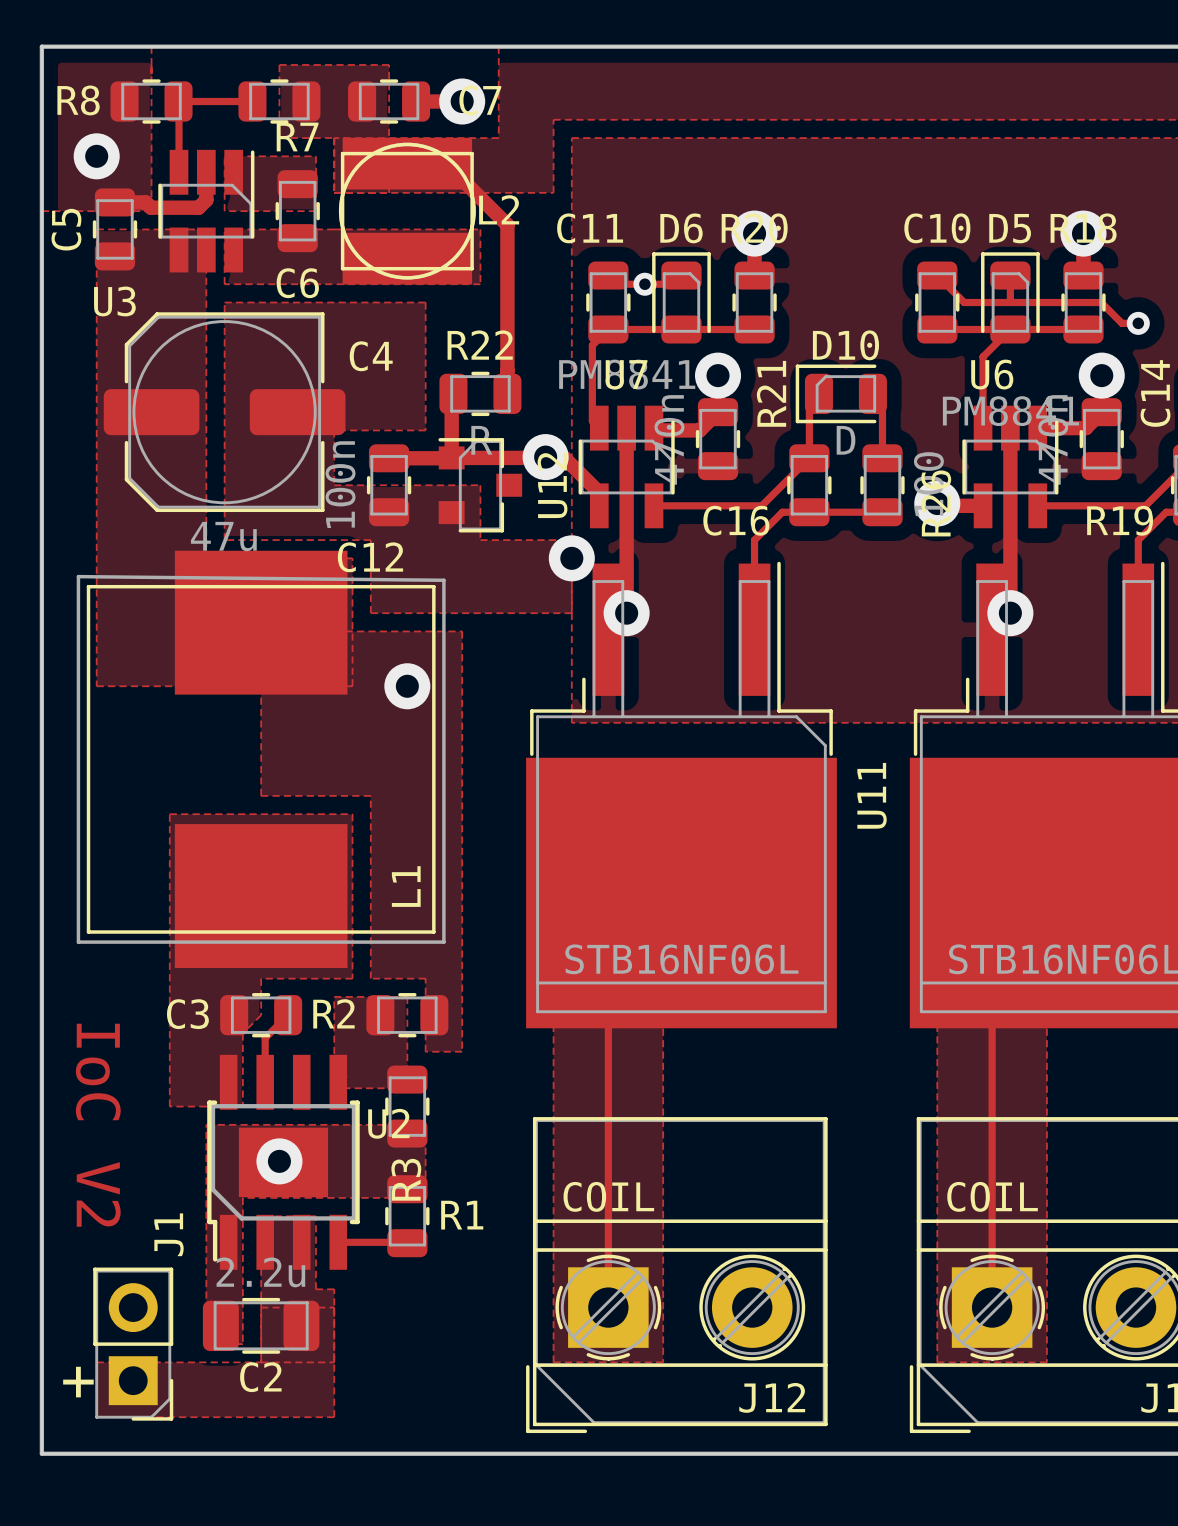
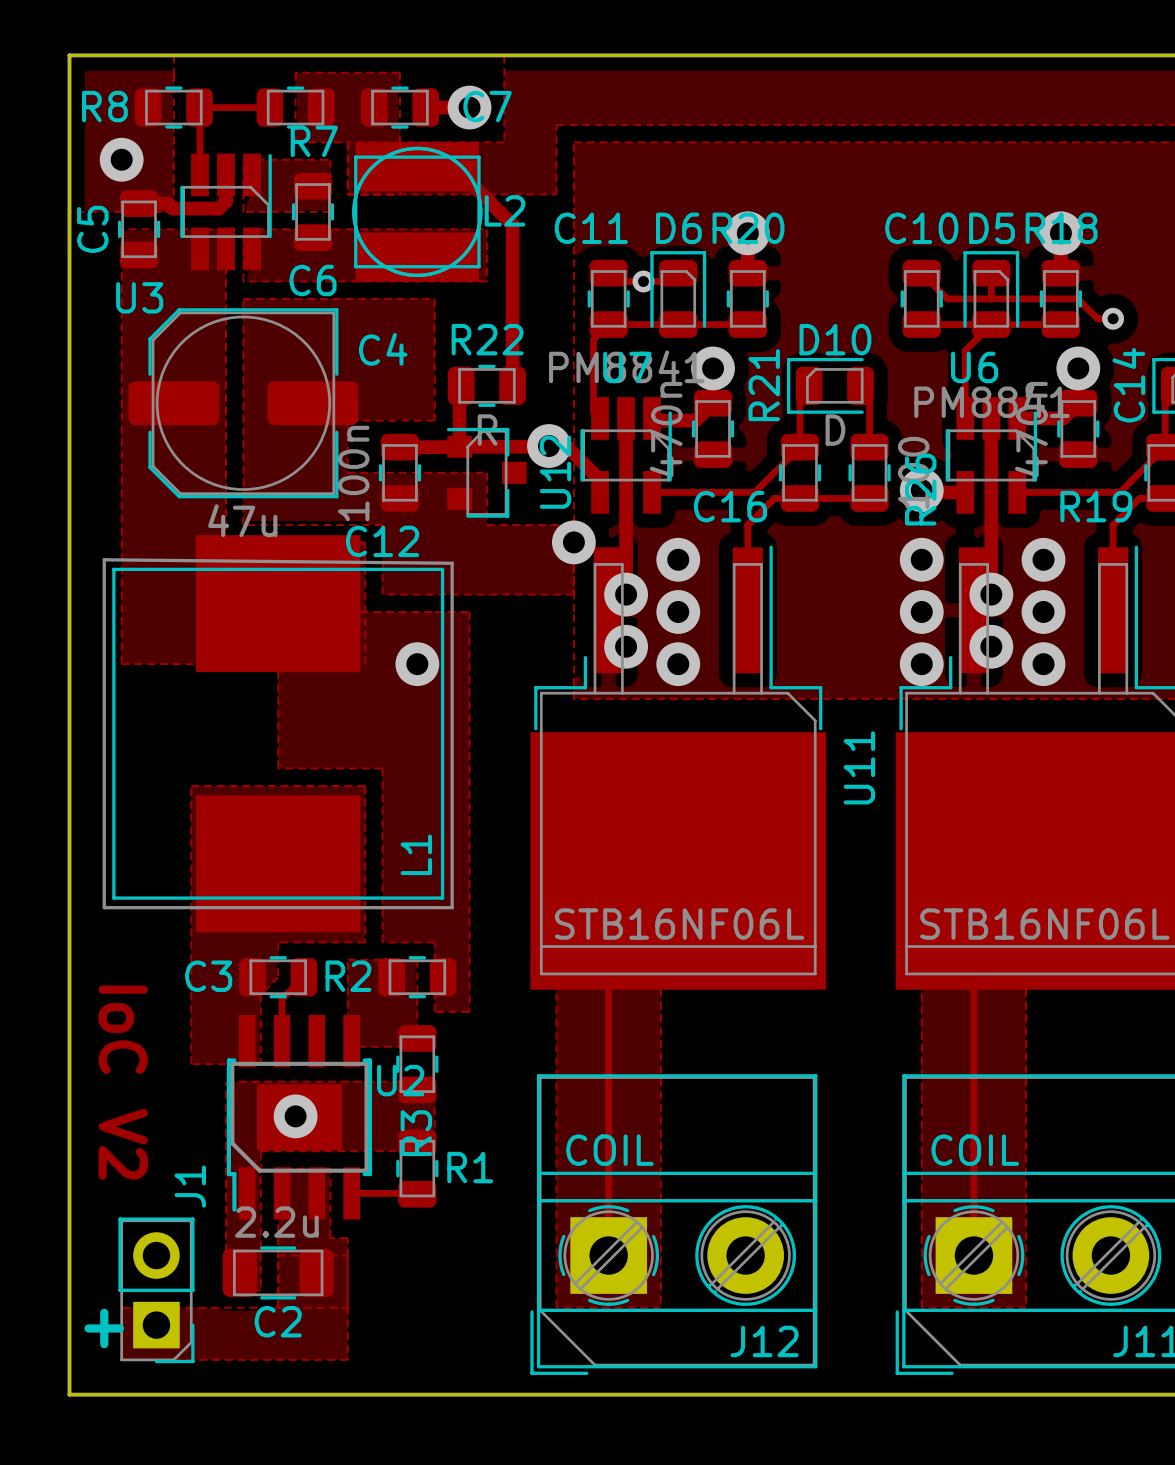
via: none -> (678, 559)
via: none -> (921, 559)
via: none -> (1043, 559)
via: none -> (678, 611)
via: none -> (921, 611)
via: none -> (1043, 611)
via: none -> (626, 646)
via: none -> (991, 646)
via: none -> (678, 664)
via: none -> (921, 664)
via: none -> (1043, 664)

